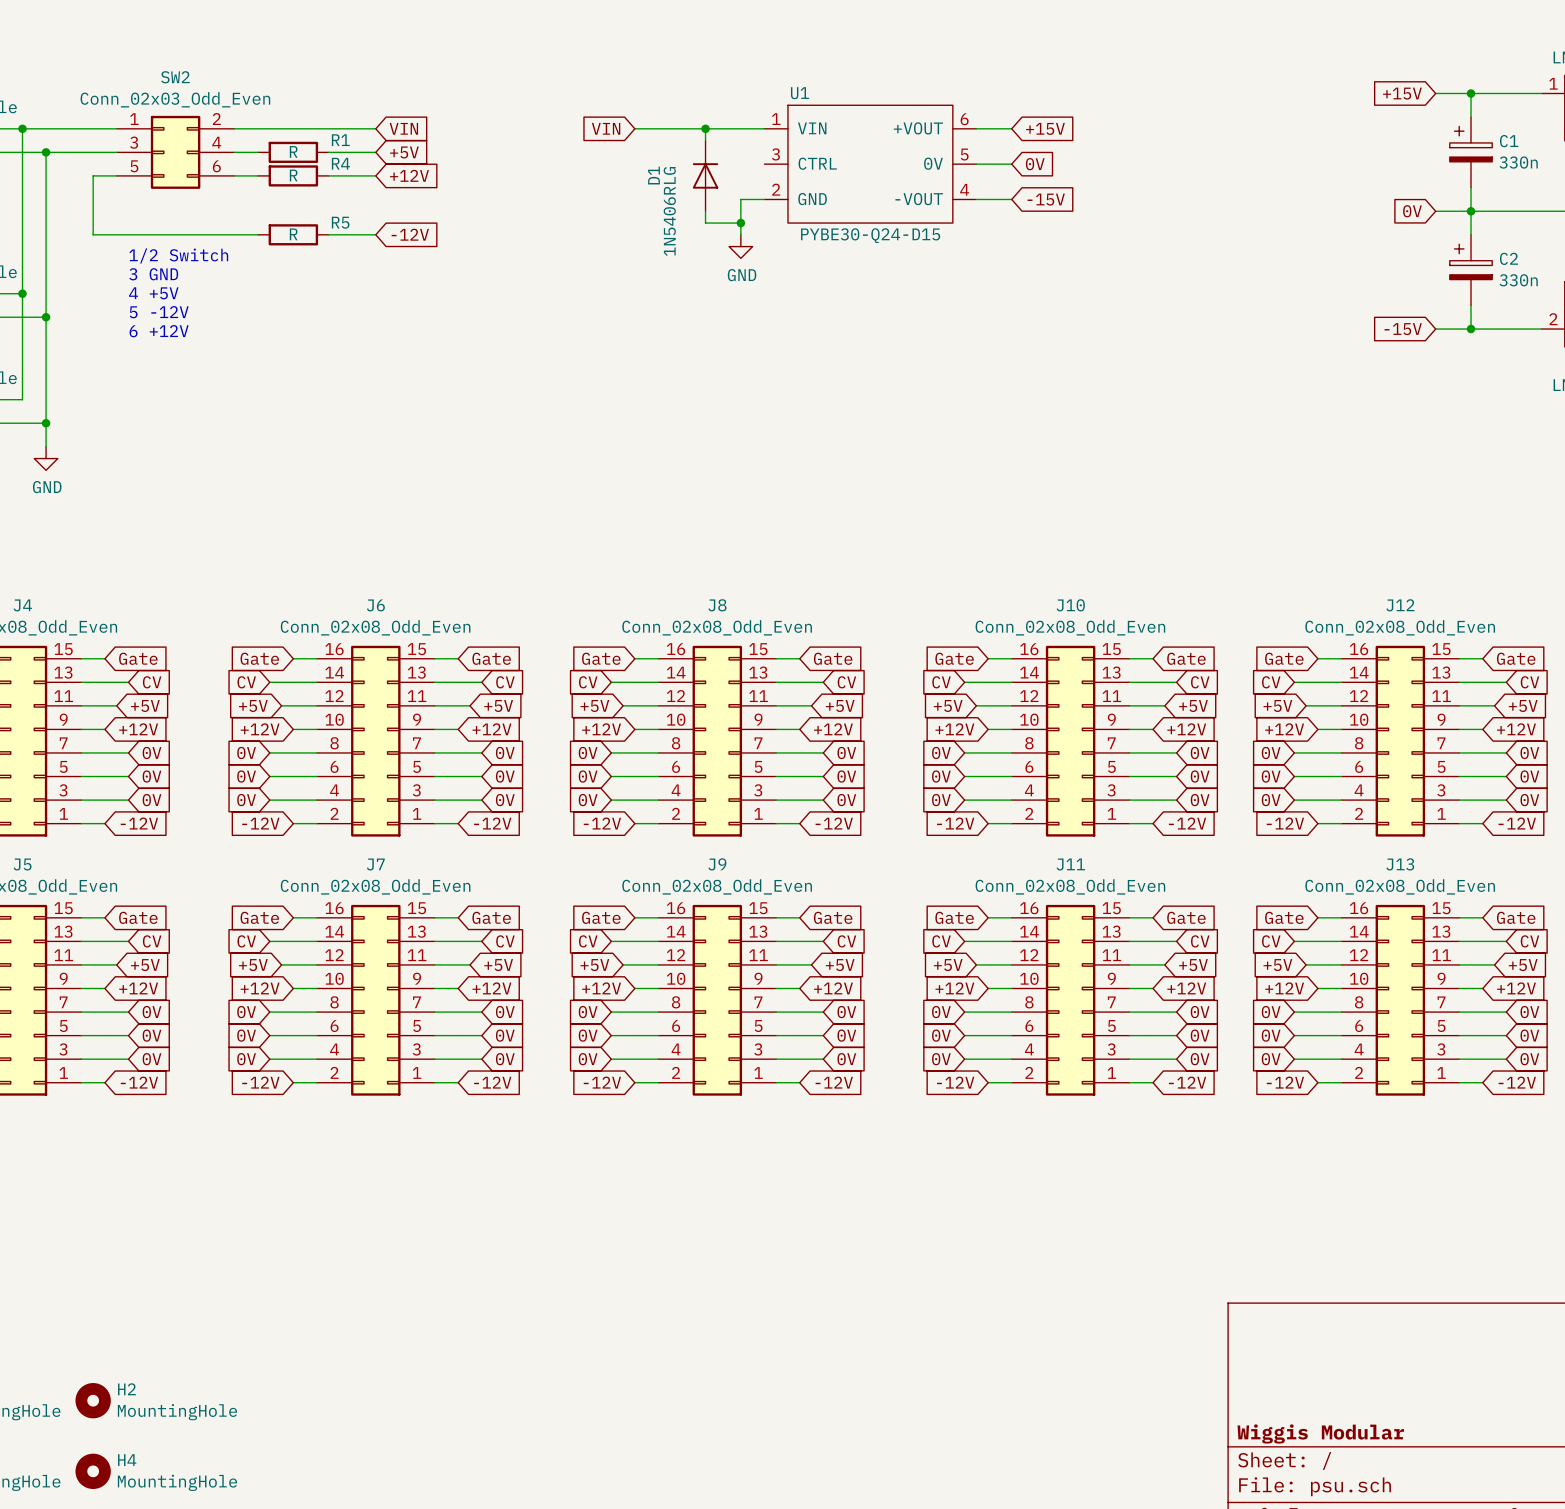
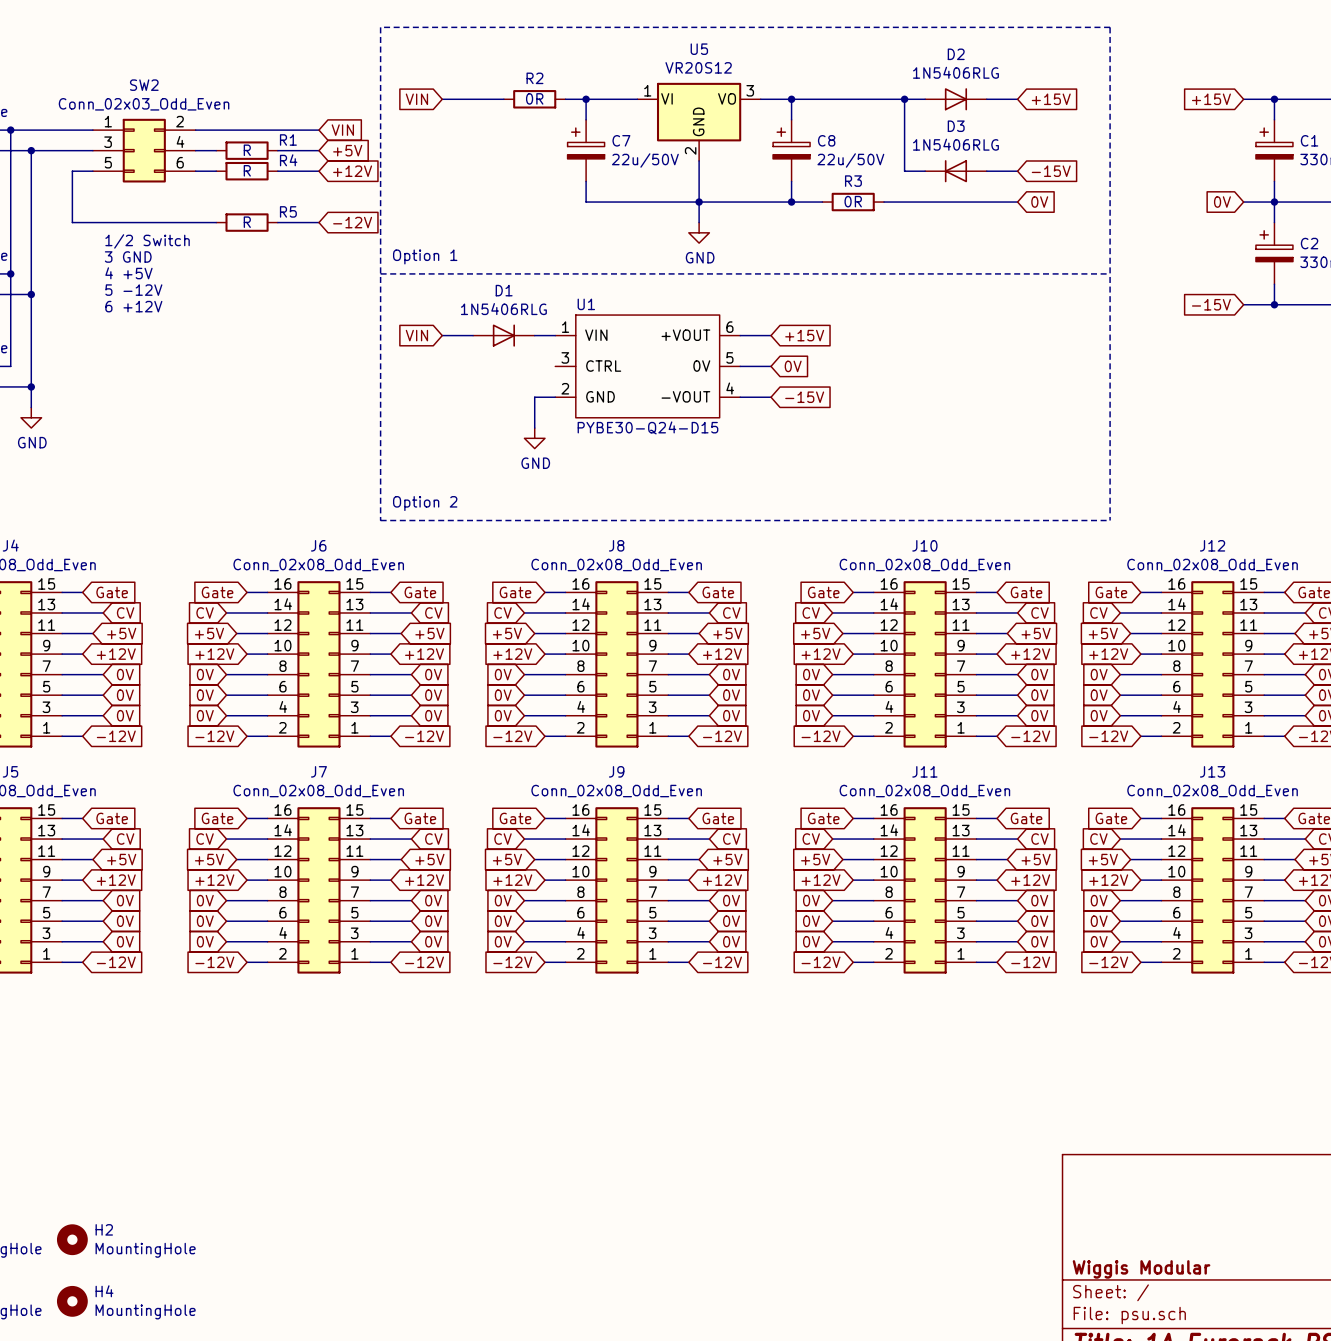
line: none -> (380, 27) (1110, 27) (1110, 520) (380, 520) (380, 27)
wire: none -> (442, 99) (503, 99)
R2: none -> 0R (534, 99)
wire: none -> (565, 99) (637, 99)
wire: none -> (586, 99) (586, 119)
wire: none -> (760, 99) (925, 99)
wire: none -> (791, 99) (791, 119)
junction: none -> (791, 99)
wire: none -> (904, 99) (904, 171) (925, 171)
junction: none -> (904, 99)
D2: none -> 1N5406RLG (955, 99)
global label: none -> +15V (1051, 99)
U5: none -> VR20S12 (699, 121)
global label position: VIN (606, 128) -> VIN (416, 99)
wire: (634, 128) (764, 128) -> none
wire: (705, 128) (705, 140) -> none
junction position: (705, 128) -> (586, 99)
wire: (976, 128) (1011, 128) -> (986, 99) (1017, 99)
global label: +15V (1045, 128) -> none
C7: none -> 22u/50V (586, 150)
C8: none -> 22u/50V (791, 150)
wire: none -> (699, 160) (699, 222)
U1 position: (870, 164) -> (647, 366)
wire: (976, 164) (1011, 164) -> (986, 171) (1017, 171)
global label: 0V (1035, 164) -> none
D1 rotation: 0° (705, 175) -> 90° clockwise (503, 335)
D1 position: (705, 175) -> (503, 335)
D3: none -> 1N5406RLG (955, 171)
global label: none -> -15V (1051, 171)
wire: none -> (586, 181) (586, 202) (822, 202)
wire: none -> (791, 181) (791, 202)
wire: (764, 199) (740, 199) (740, 234) -> none
wire: (976, 199) (1011, 199) -> (740, 335) (771, 335)
global label: -15V (1046, 199) -> none
D1 value position: 1N5406RLG (669, 211) -> 1N5406RLG (503, 309)
wire: (705, 211) (705, 223) (740, 223) -> none
junction: none -> (699, 202)
junction: none -> (791, 202)
R3: none -> 0R (853, 202)
wire: none -> (884, 202) (1017, 202)
global label: none -> 0V (1039, 202)
junction: (740, 223) -> none
power symbol position: GND (740, 246) -> GND (699, 232)
text: none -> Option 1 (425, 256)
line: none -> (380, 273) (1110, 273)
global label: none -> VIN (416, 335)
wire: none -> (442, 335) (473, 335)
wire: none -> (534, 335) (555, 335)
global label: none -> +15V (804, 335)
wire: none -> (740, 366) (771, 366)
global label: none -> 0V (793, 366)
wire: none -> (555, 397) (534, 397) (534, 428)
wire: none -> (740, 397) (771, 397)
global label: none -> -15V (804, 397)
power symbol: none -> GND (534, 438)
text: none -> Option 2 (425, 503)

